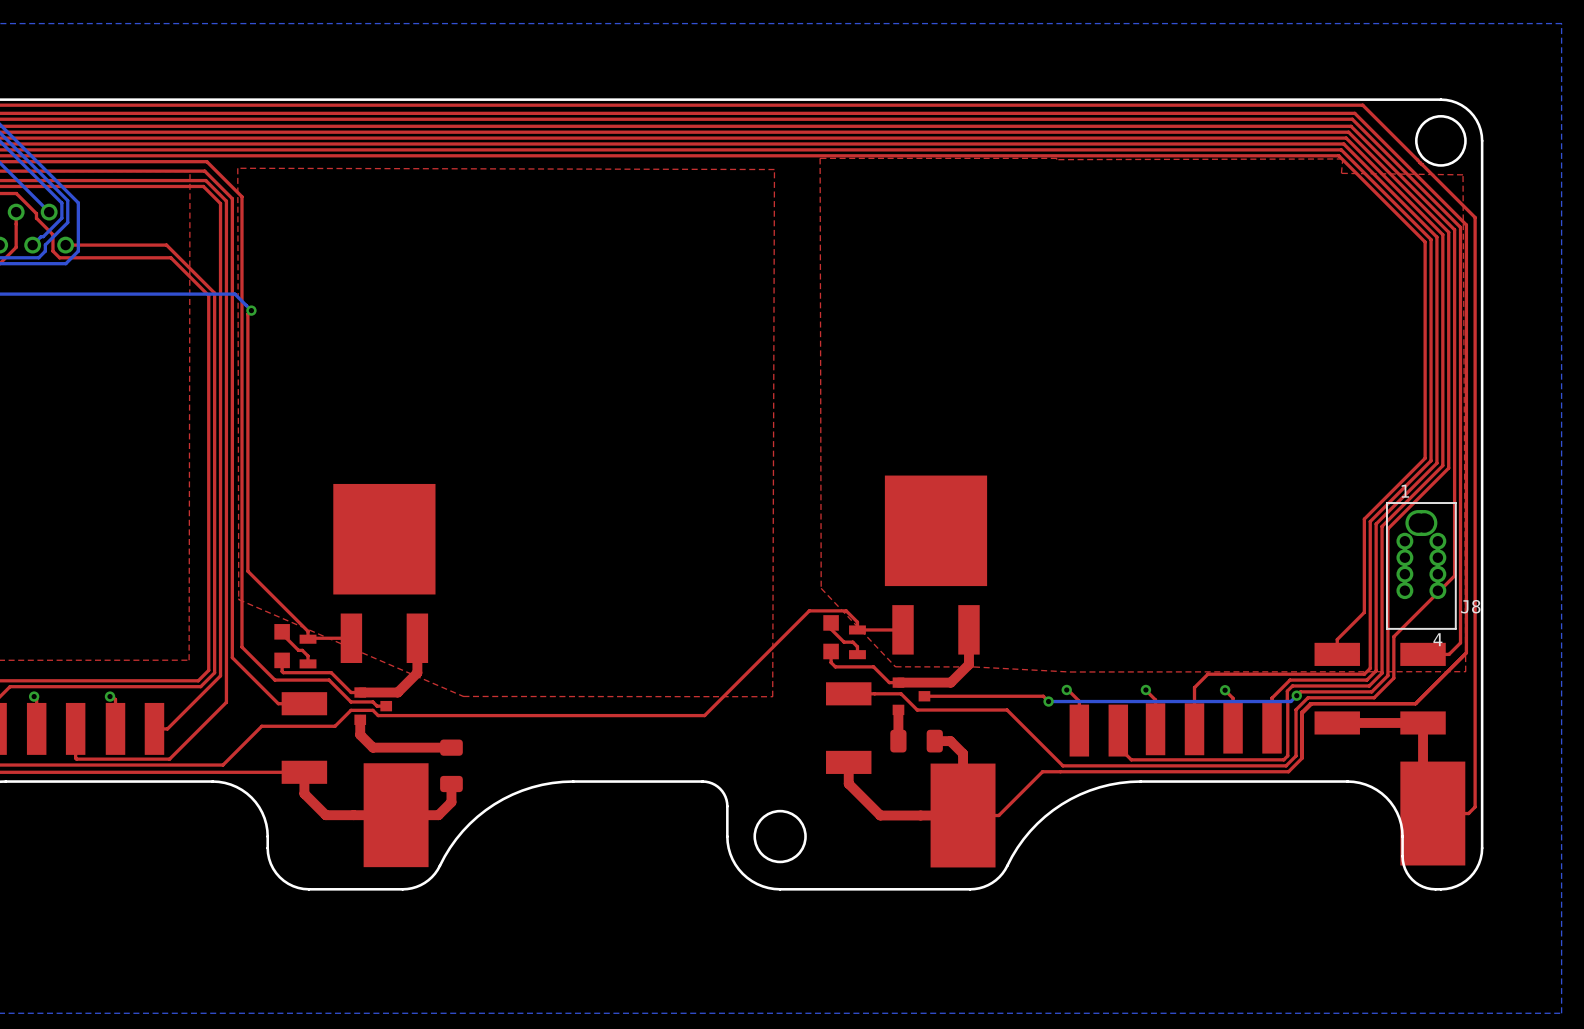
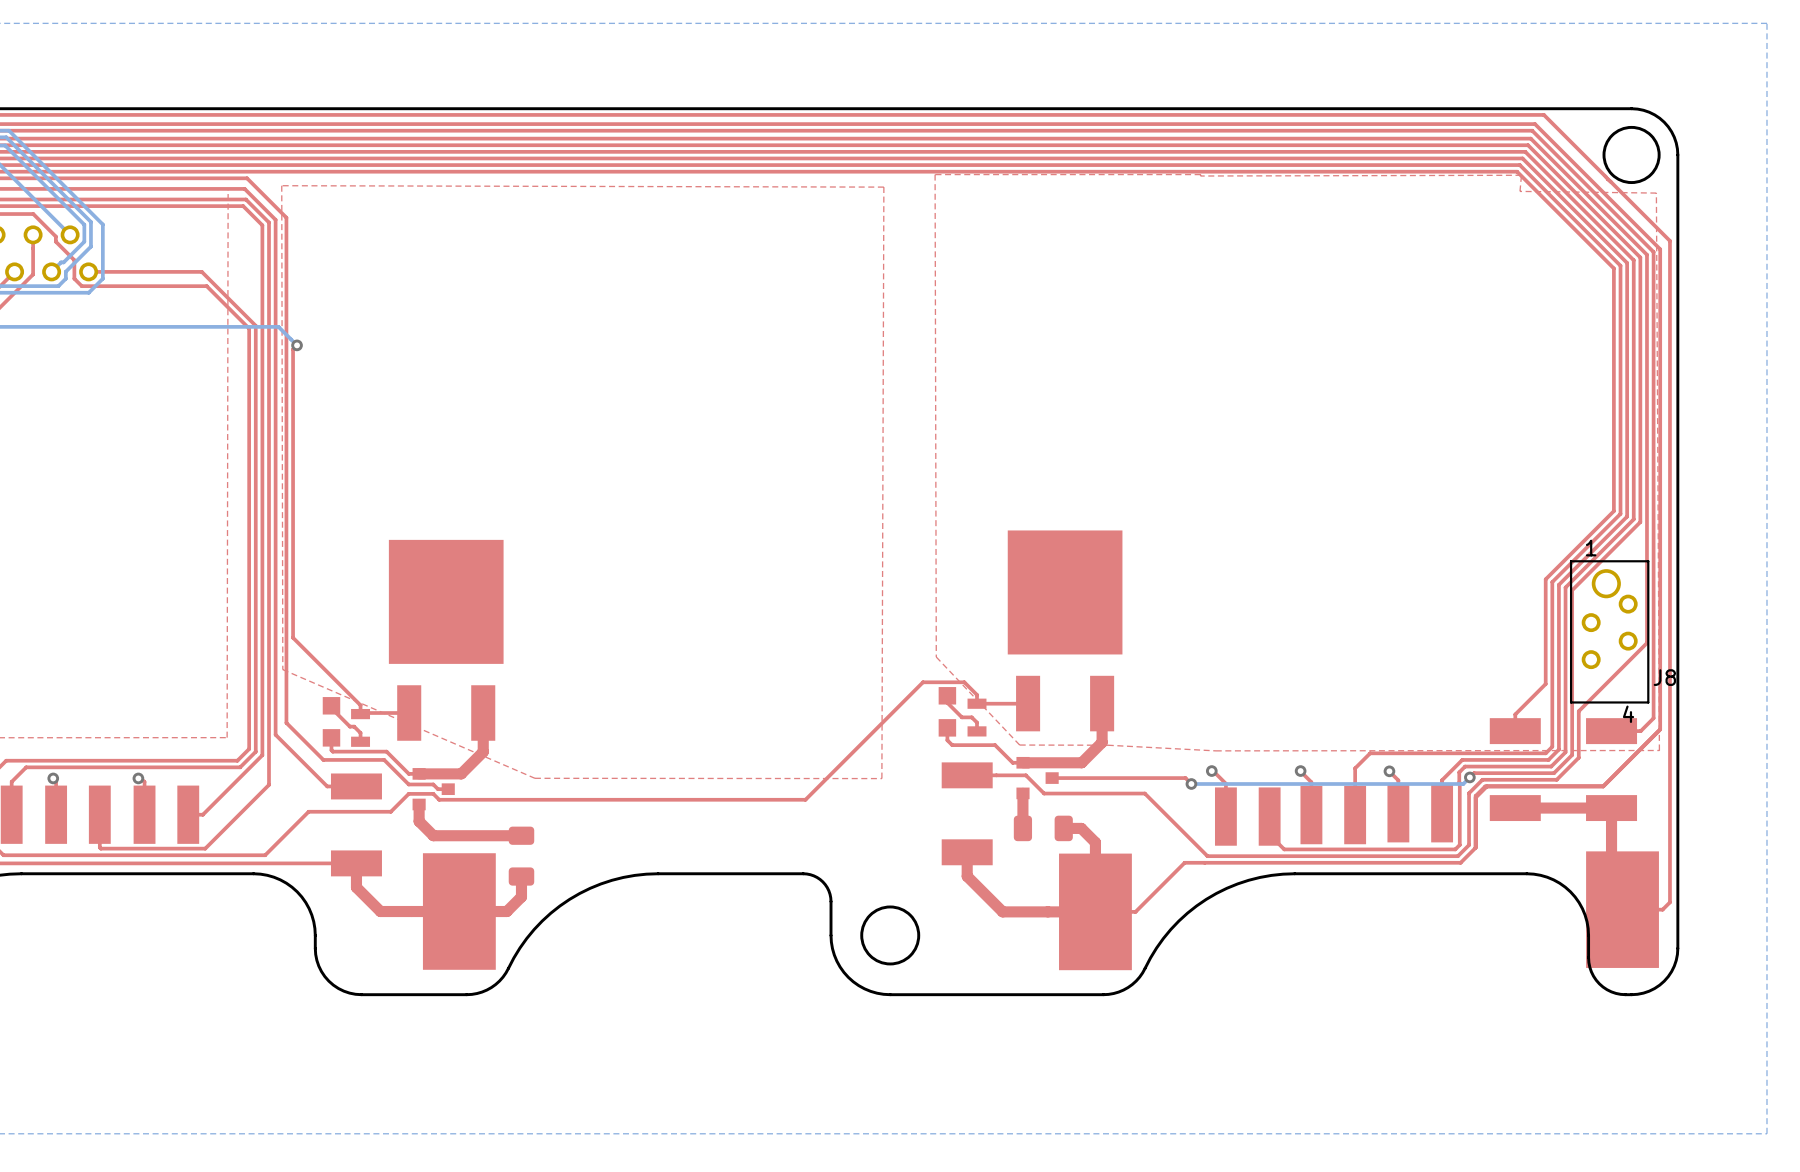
J8 footprint: [1385, 502, 1457, 630] -> [1569, 560, 1650, 704]

